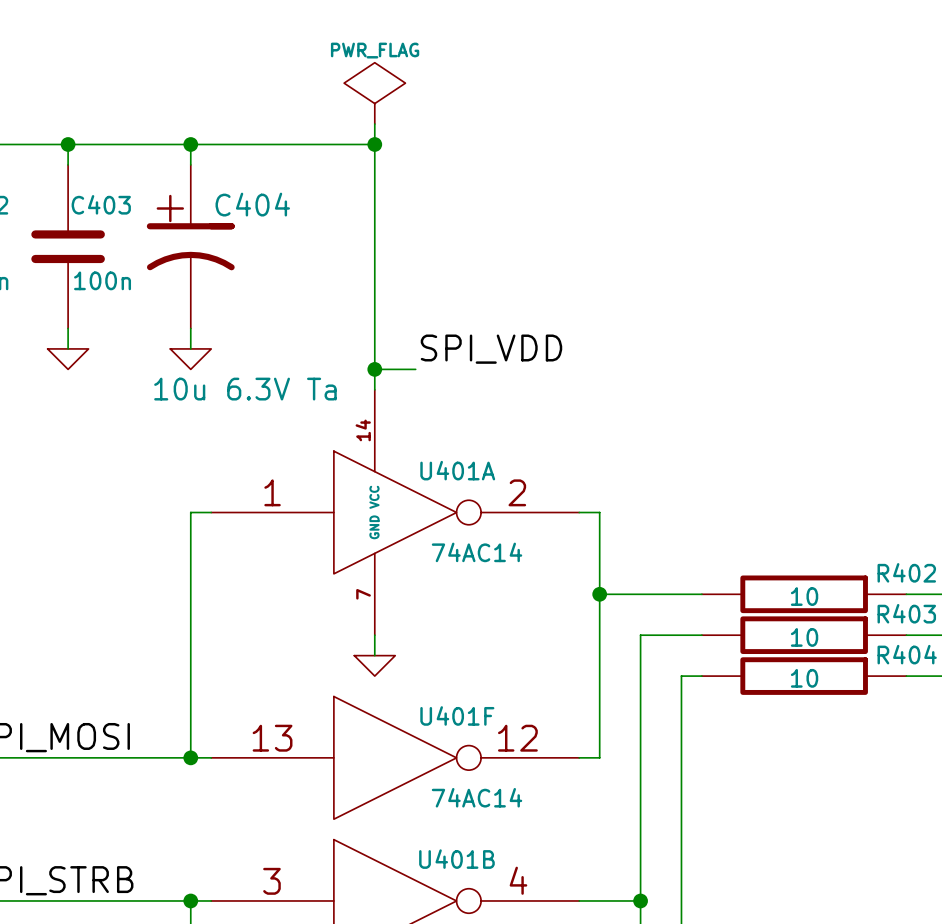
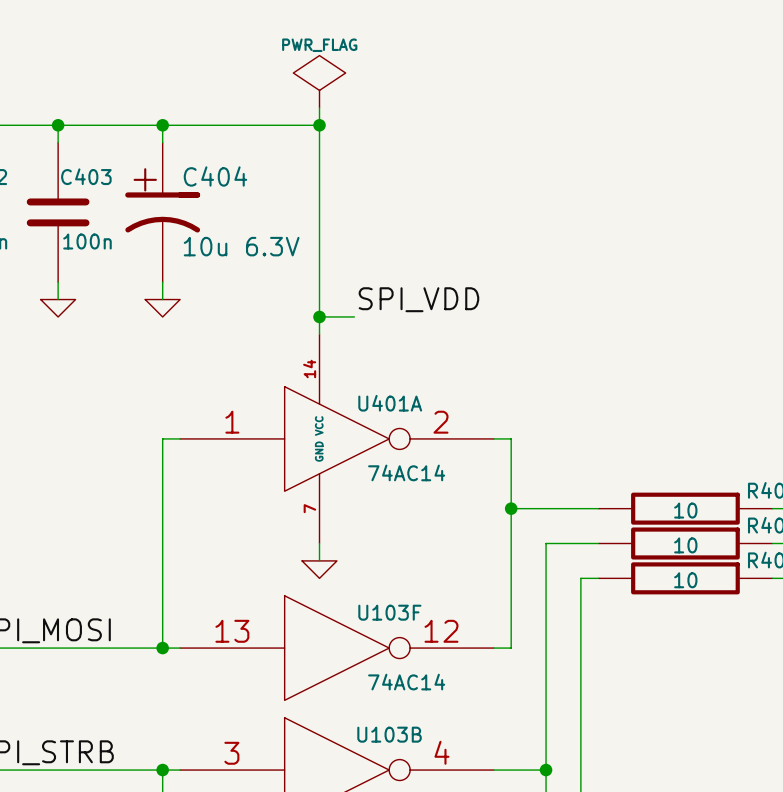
C404 value: 10u 6.3V Ta (245, 389) -> 10u 6.3V (241, 246)
U401F name: U401F (457, 715) -> U103F (389, 612)
U401B name: U401B (456, 859) -> U103B (389, 734)

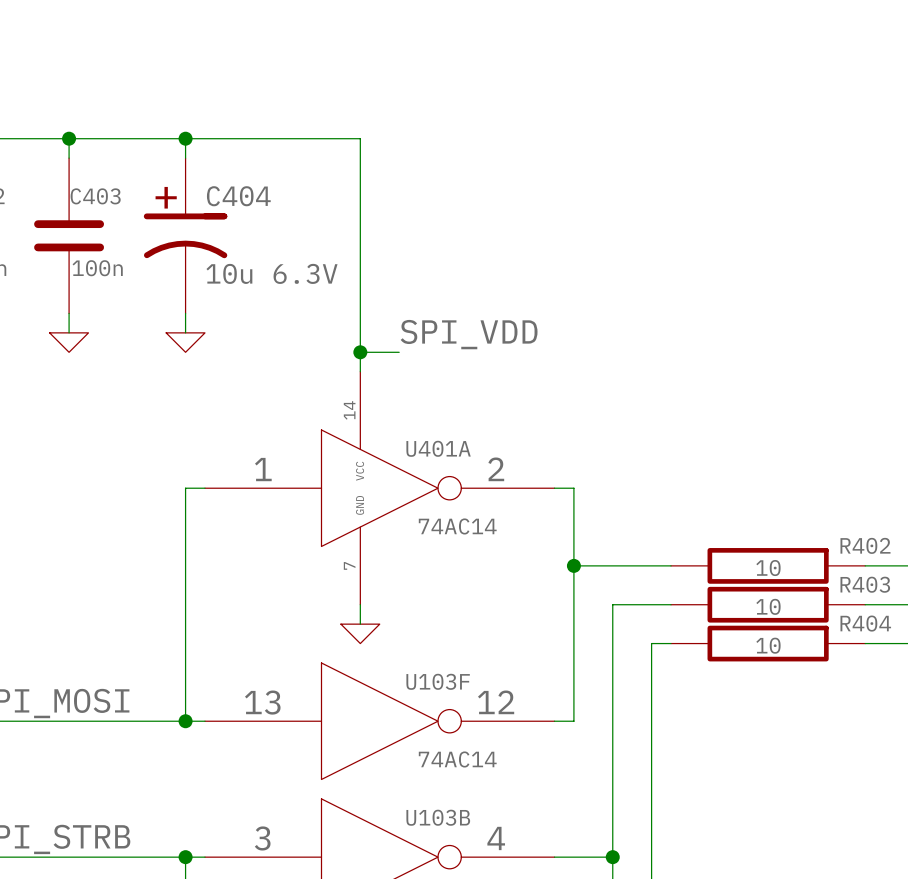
power symbol: PWR_FLAG (319, 81) -> none
wire: (319, 107) (319, 125) -> none
junction: (319, 125) -> none

